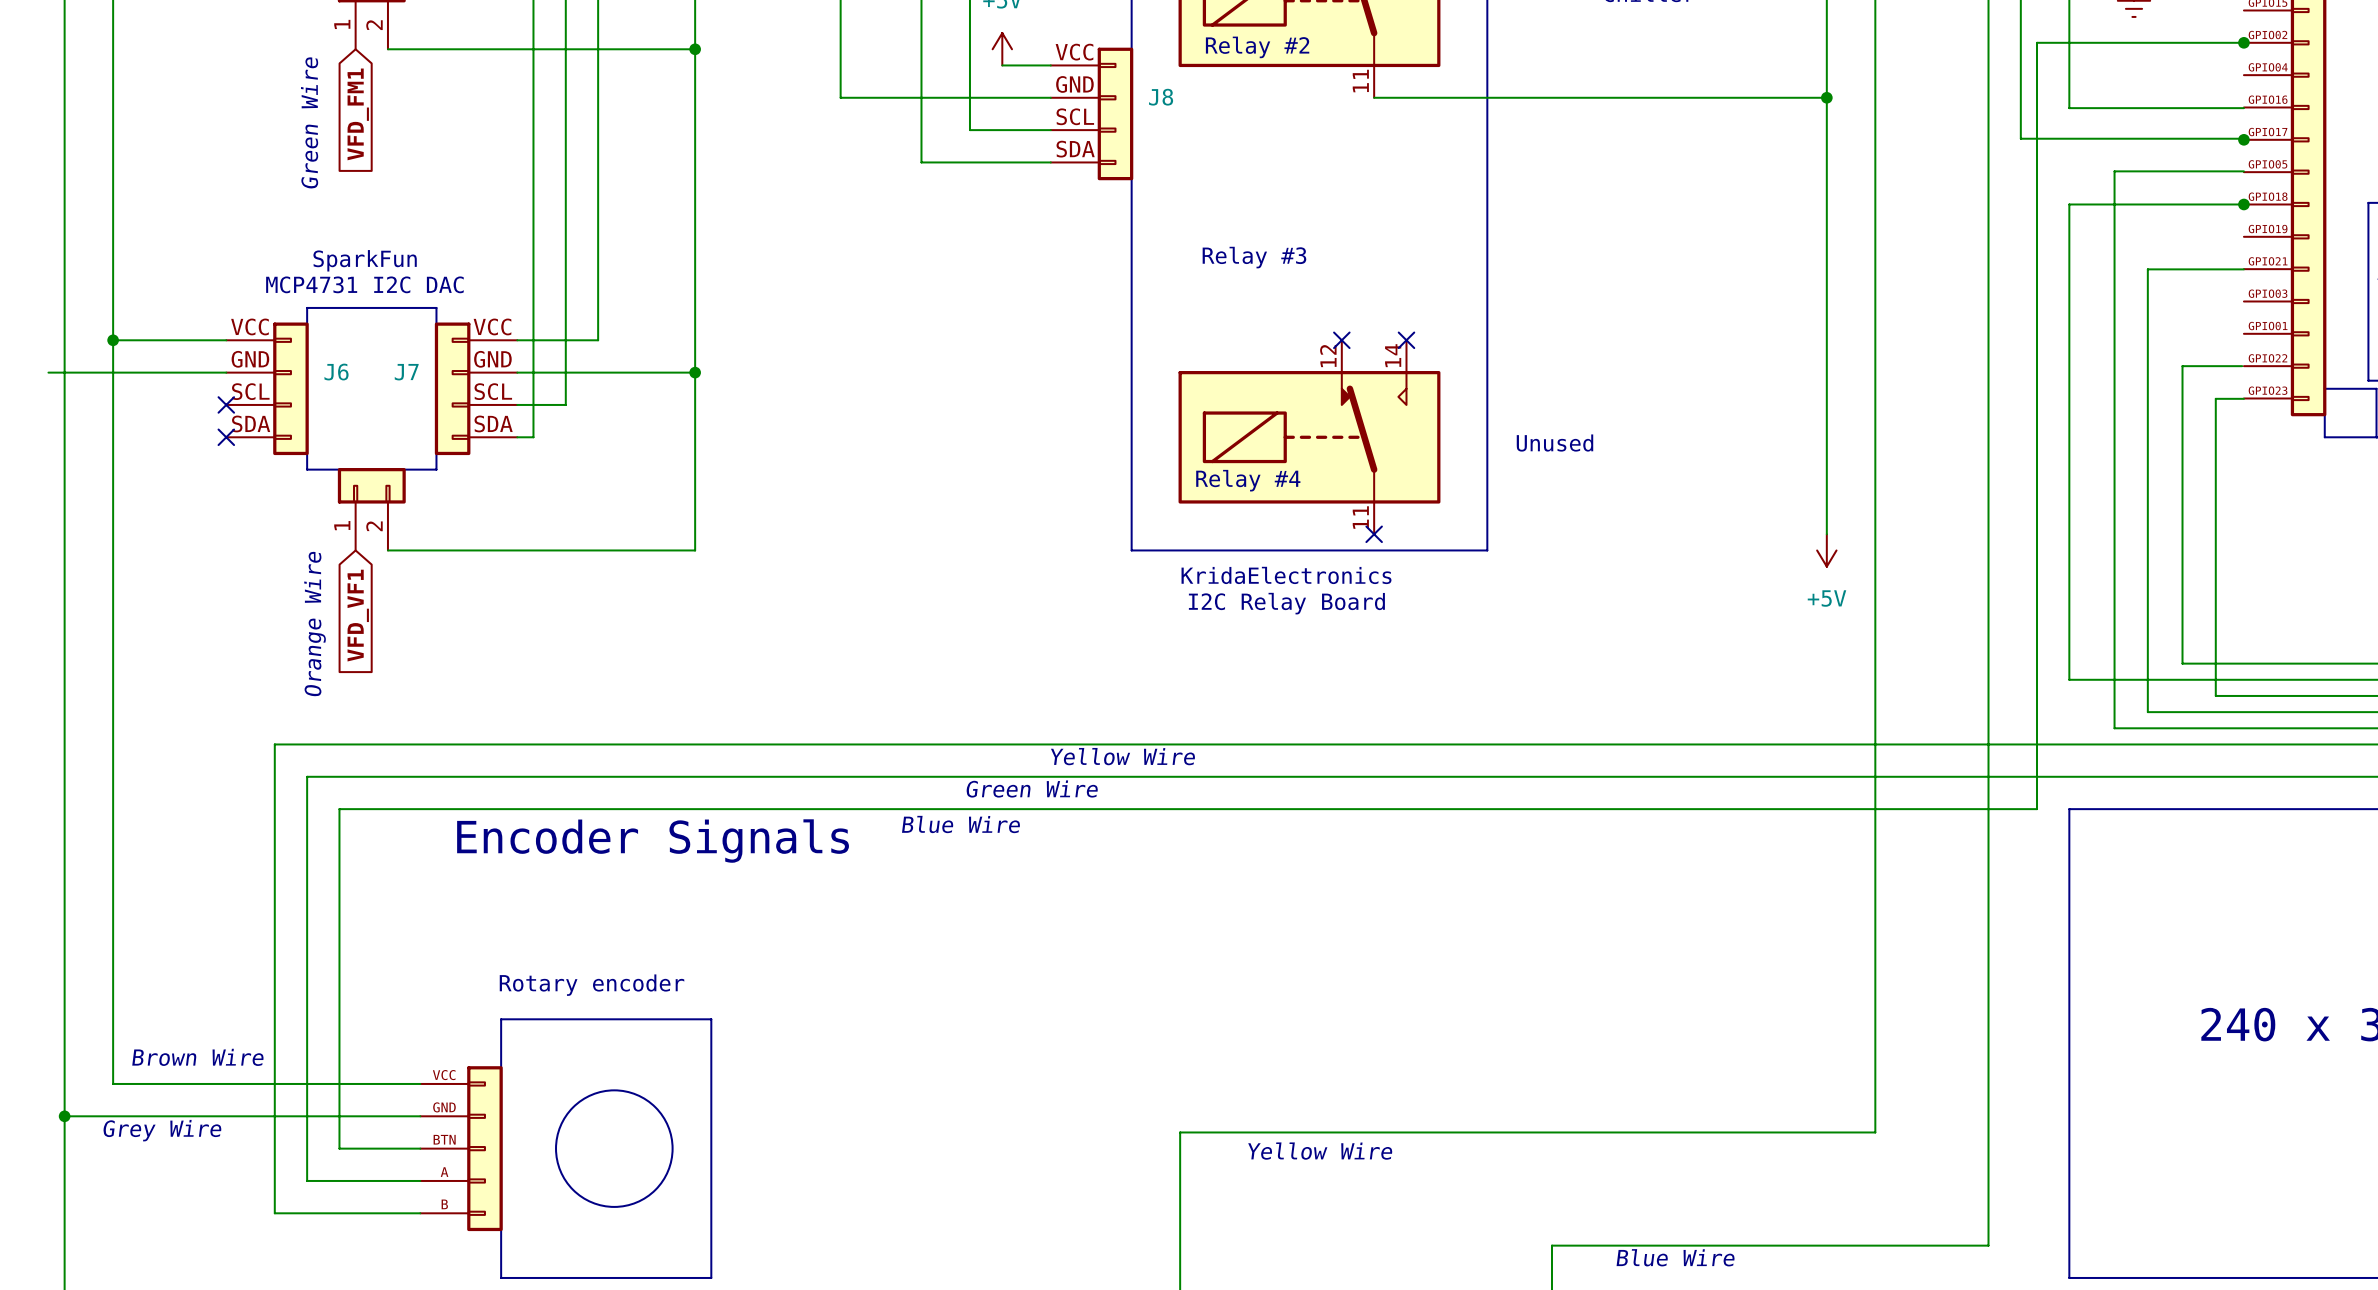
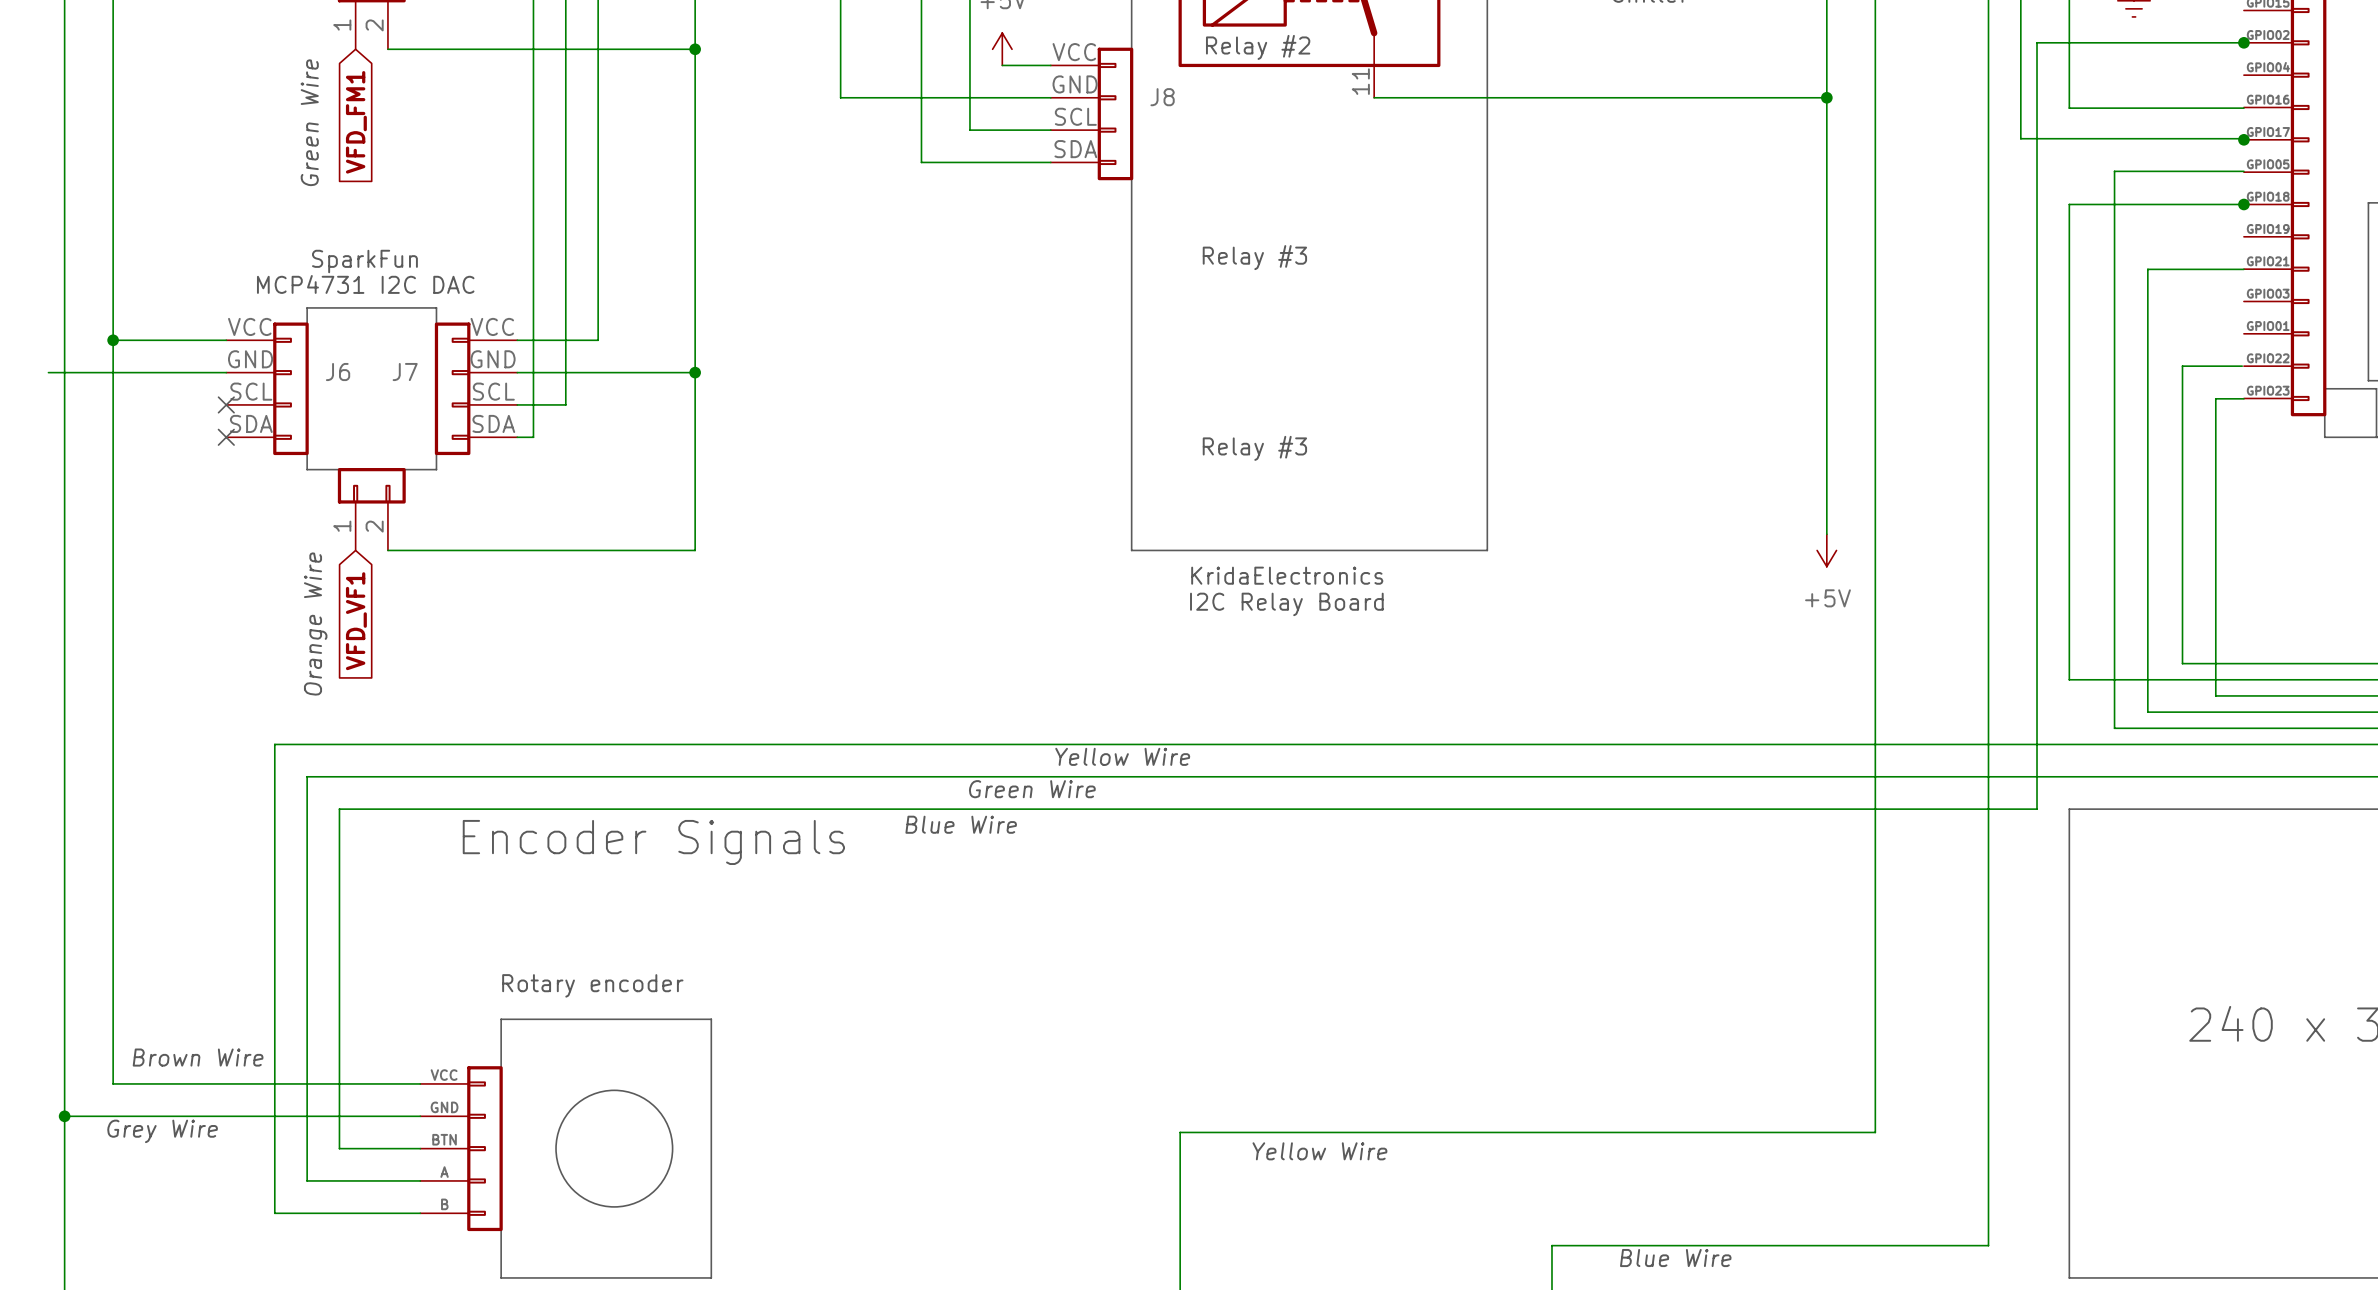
no-connect mark: (1341, 340) -> none
no-connect mark: (1406, 340) -> none
part: (1309, 437) -> none
text: Unused (1554, 443) -> none
text: Relay #4 (1248, 480) -> Relay #3 (1254, 448)
no-connect mark: (1374, 534) -> none

